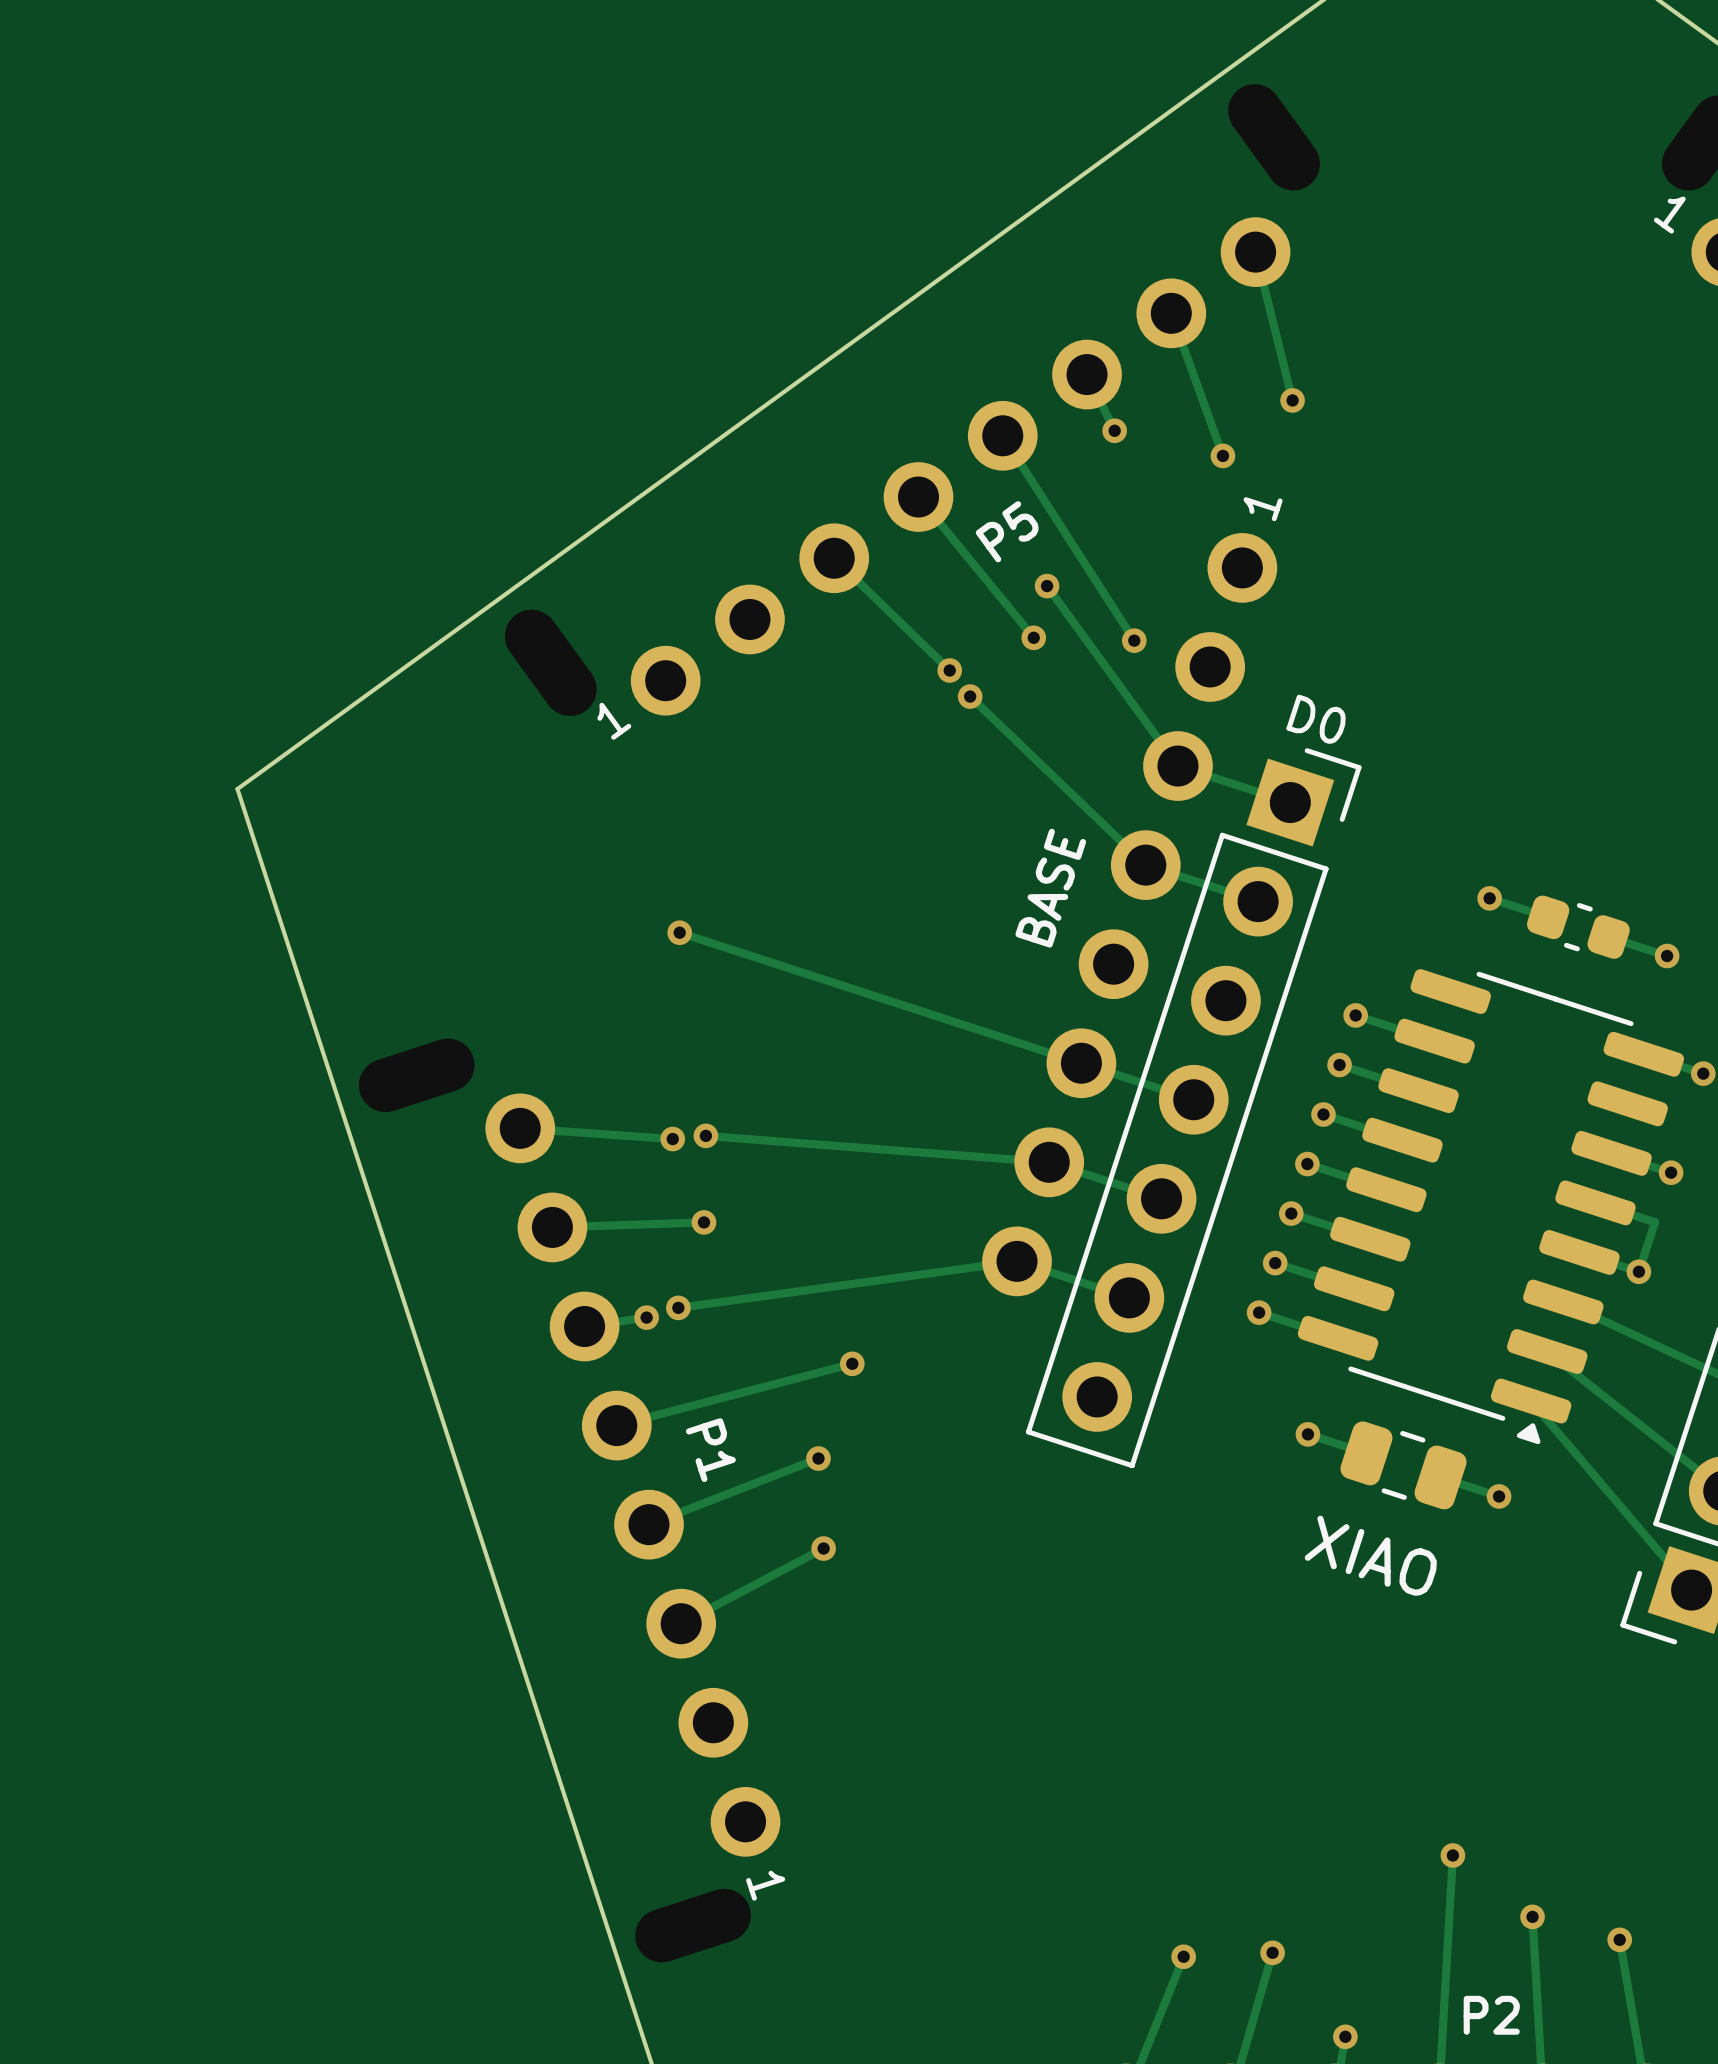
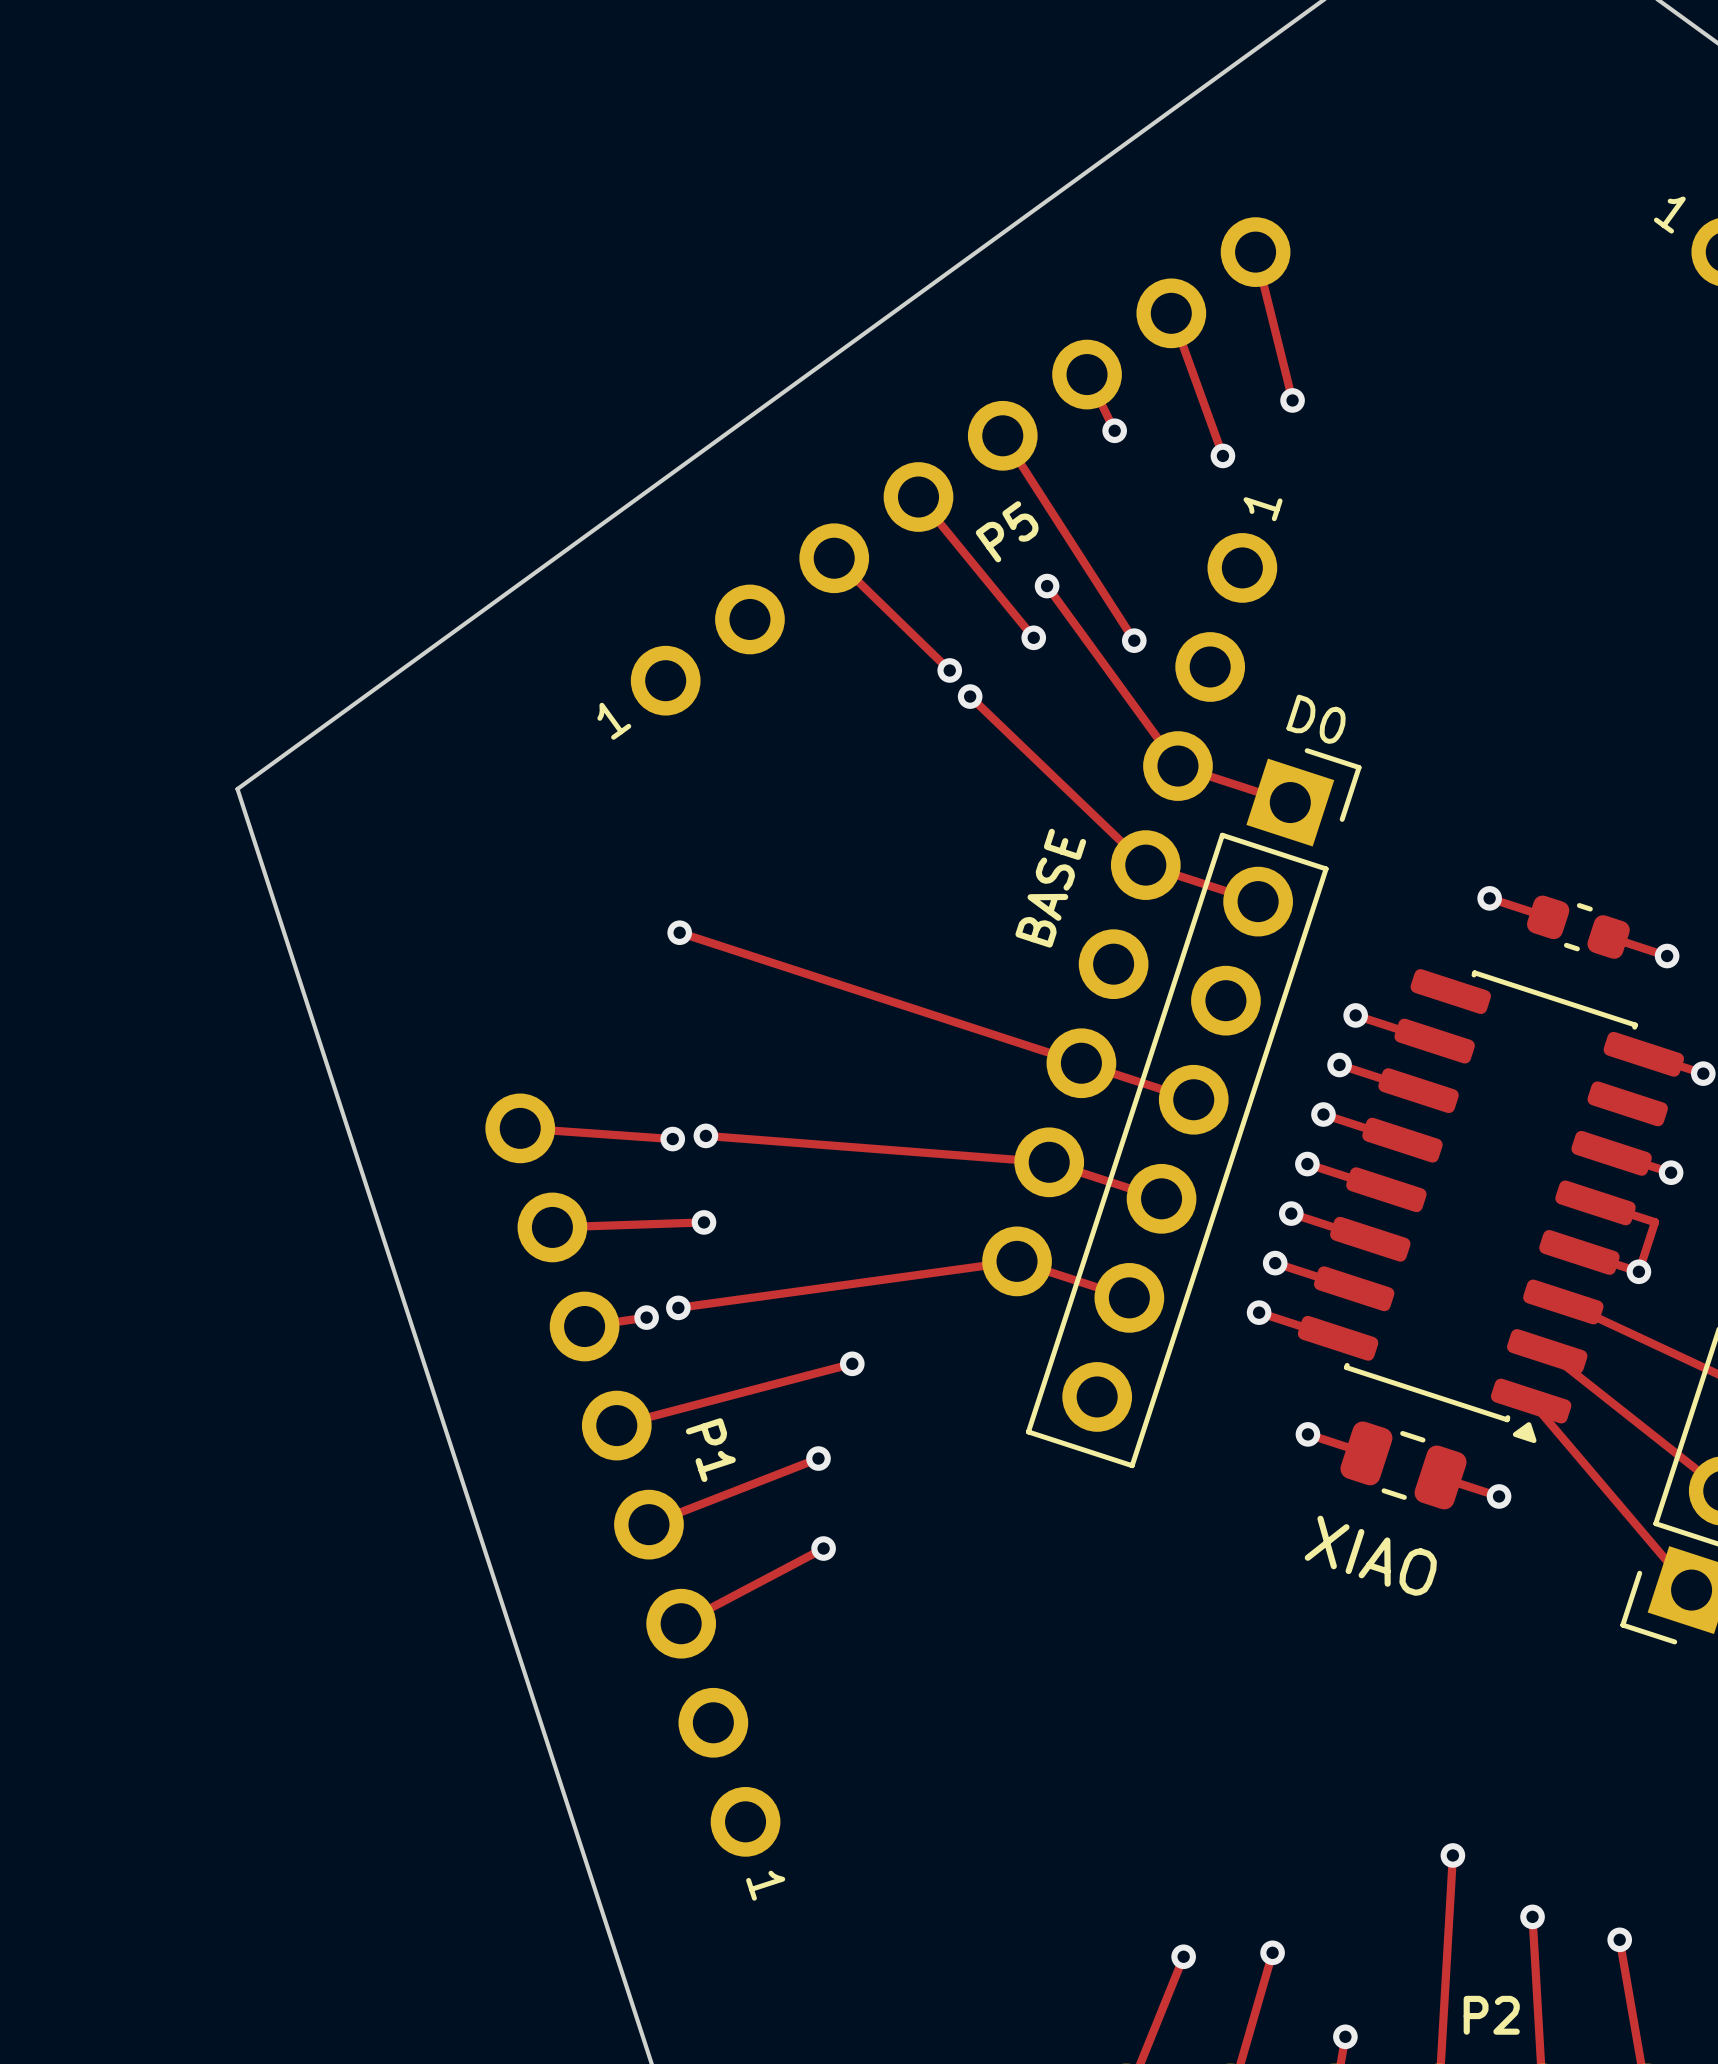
part footprint: [1297, 969, 1685, 1445] -> [1297, 969, 1685, 1444]

